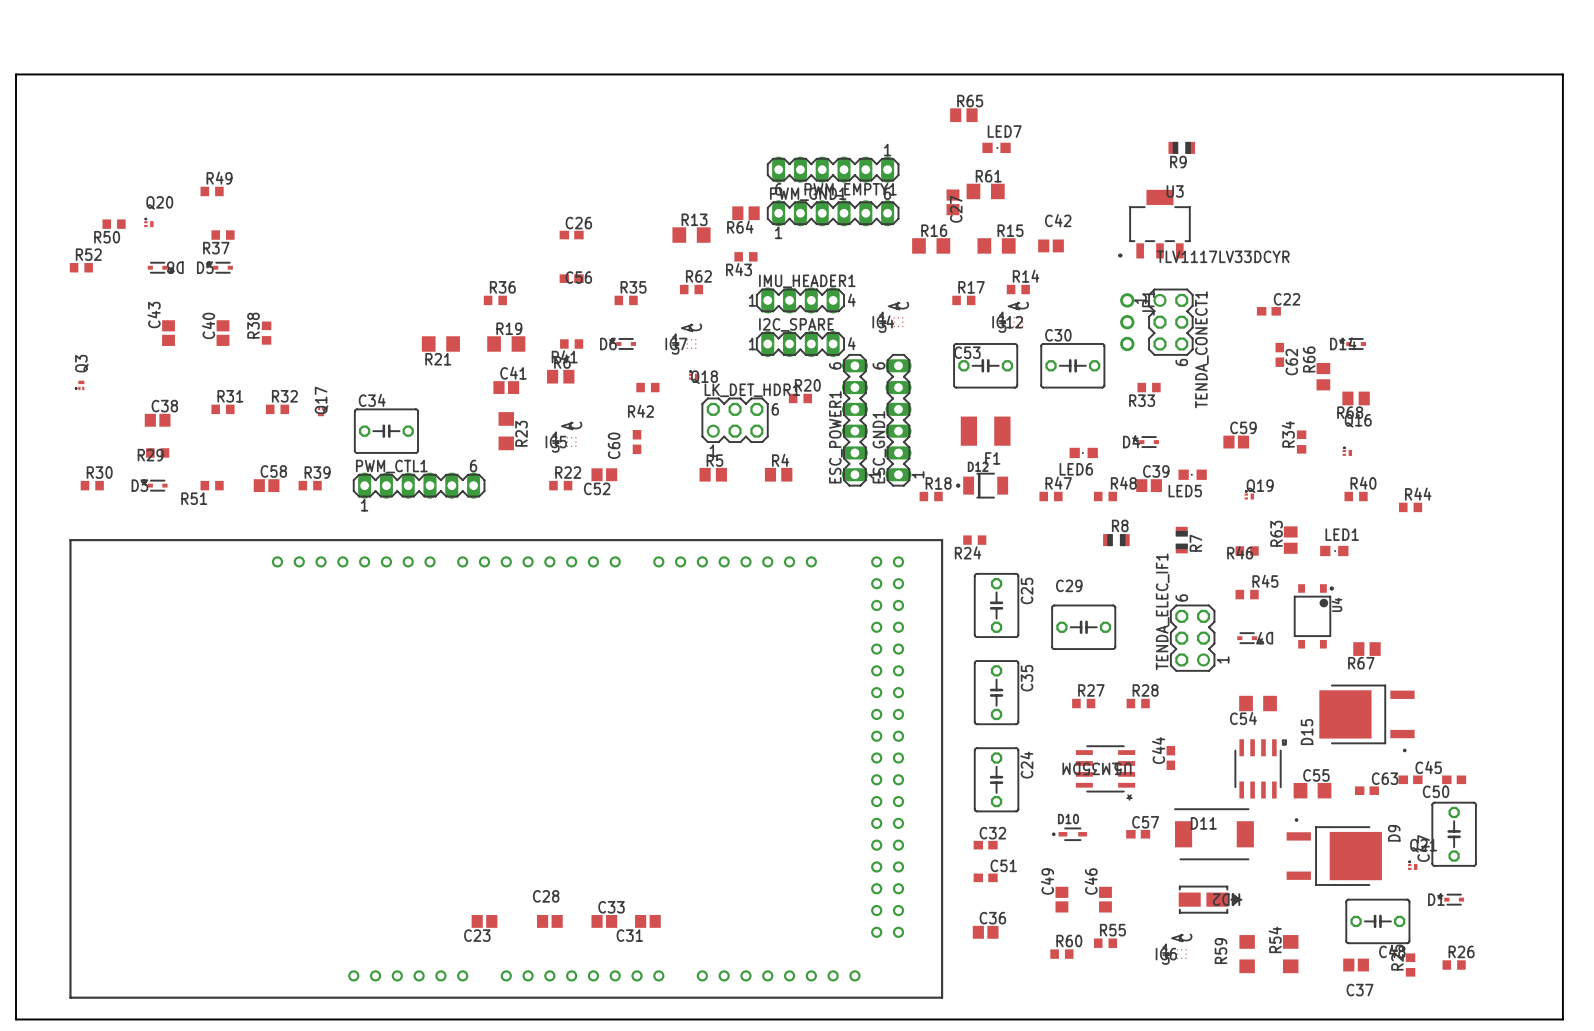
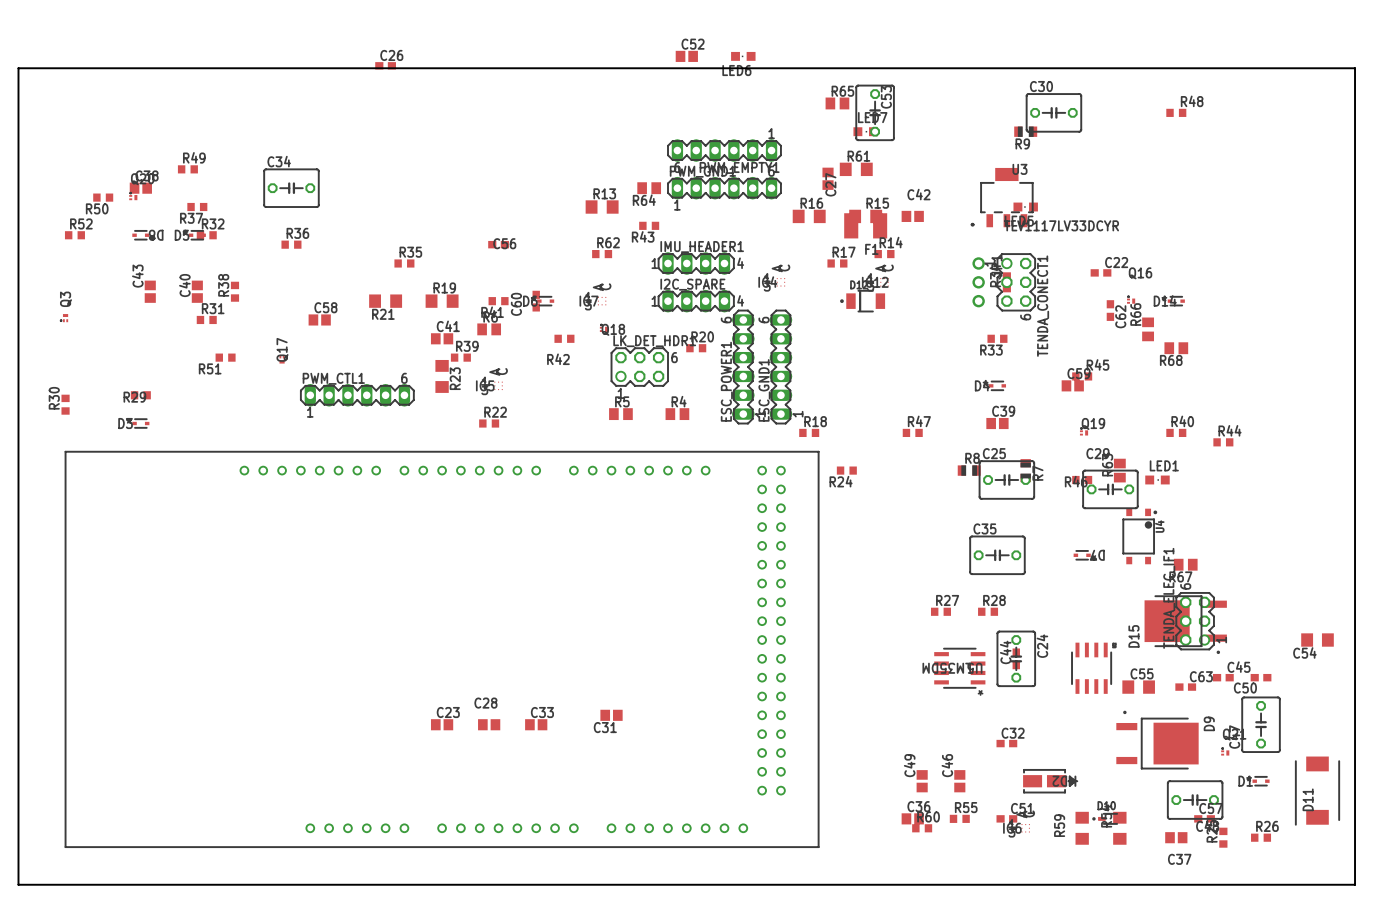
C26 position: (571, 235) -> (385, 65)
R36 position: (495, 300) -> (291, 244)
R35 position: (626, 300) -> (404, 263)
C53 rotation: 0° (985, 365) -> 90° clockwise (875, 112)
C53 position: (985, 365) -> (875, 112)
C30 position: (1072, 365) -> (1053, 112)
Q3 position: (79, 385) -> (64, 318)
R31 position: (223, 409) -> (206, 319)
R32 position: (277, 409) -> (206, 235)
C38 position: (157, 420) -> (140, 188)
C34 position: (386, 431) -> (291, 188)
F1 position: (985, 431) -> (865, 225)
C60 position: (637, 442) -> (536, 301)
R34 position: (1301, 442) -> (1006, 282)
Q16 position: (1347, 451) -> (1131, 299)
LED6 position: (1083, 452) -> (743, 56)
R30 name position: R30 (99, 472) -> R30 (54, 398)
C52 position: (604, 474) -> (686, 56)
LED5 position: (1192, 474) -> (1025, 207)
R30 rotation: 0° (92, 485) -> 90° clockwise (65, 404)
R30 position: (92, 485) -> (65, 404)
R51 position: (212, 485) -> (225, 357)
C58 position: (266, 485) -> (319, 319)
R39 position: (310, 485) -> (460, 357)
PWM_CTL1 position: (419, 485) -> (357, 395)
D12 position: (982, 485) -> (862, 301)
C52 name position: C52 (597, 488) -> C52 (693, 44)
R48 position: (1105, 496) -> (1176, 112)
R45 position: (1247, 594) -> (1082, 376)
C25 rotation: 0° (996, 605) -> 90° counterclockwise (1006, 479)
C25 position: (996, 605) -> (1006, 479)
C29 position: (1083, 627) -> (1110, 489)
TENDA_ELEC_IF1 position: (1192, 638) -> (1195, 621)
C35 rotation: 0° (996, 692) -> 90° counterclockwise (997, 555)
C35 position: (996, 692) -> (997, 555)
C54 position: (1258, 703) -> (1317, 640)
part position: (506, 768) -> (442, 649)
C24 position: (996, 779) -> (1016, 658)
D10 position: (1069, 834) -> (1107, 818)
C57 position: (1138, 834) -> (1204, 818)
D11 rotation: 0° (1214, 834) -> 90° counterclockwise (1317, 791)
D11 position: (1214, 834) -> (1317, 791)
C32 position: (985, 845) -> (1006, 743)
C51 position: (985, 877) -> (1006, 818)
C23 position: (484, 921) -> (442, 724)
C28 position: (549, 921) -> (489, 724)
C33 position: (604, 921) -> (536, 724)
C31 position: (647, 921) -> (611, 715)
C36 position: (985, 932) -> (912, 818)
C23 name position: C23 (477, 935) -> C23 (448, 712)
C31 name position: C31 (629, 935) -> C31 (605, 727)

